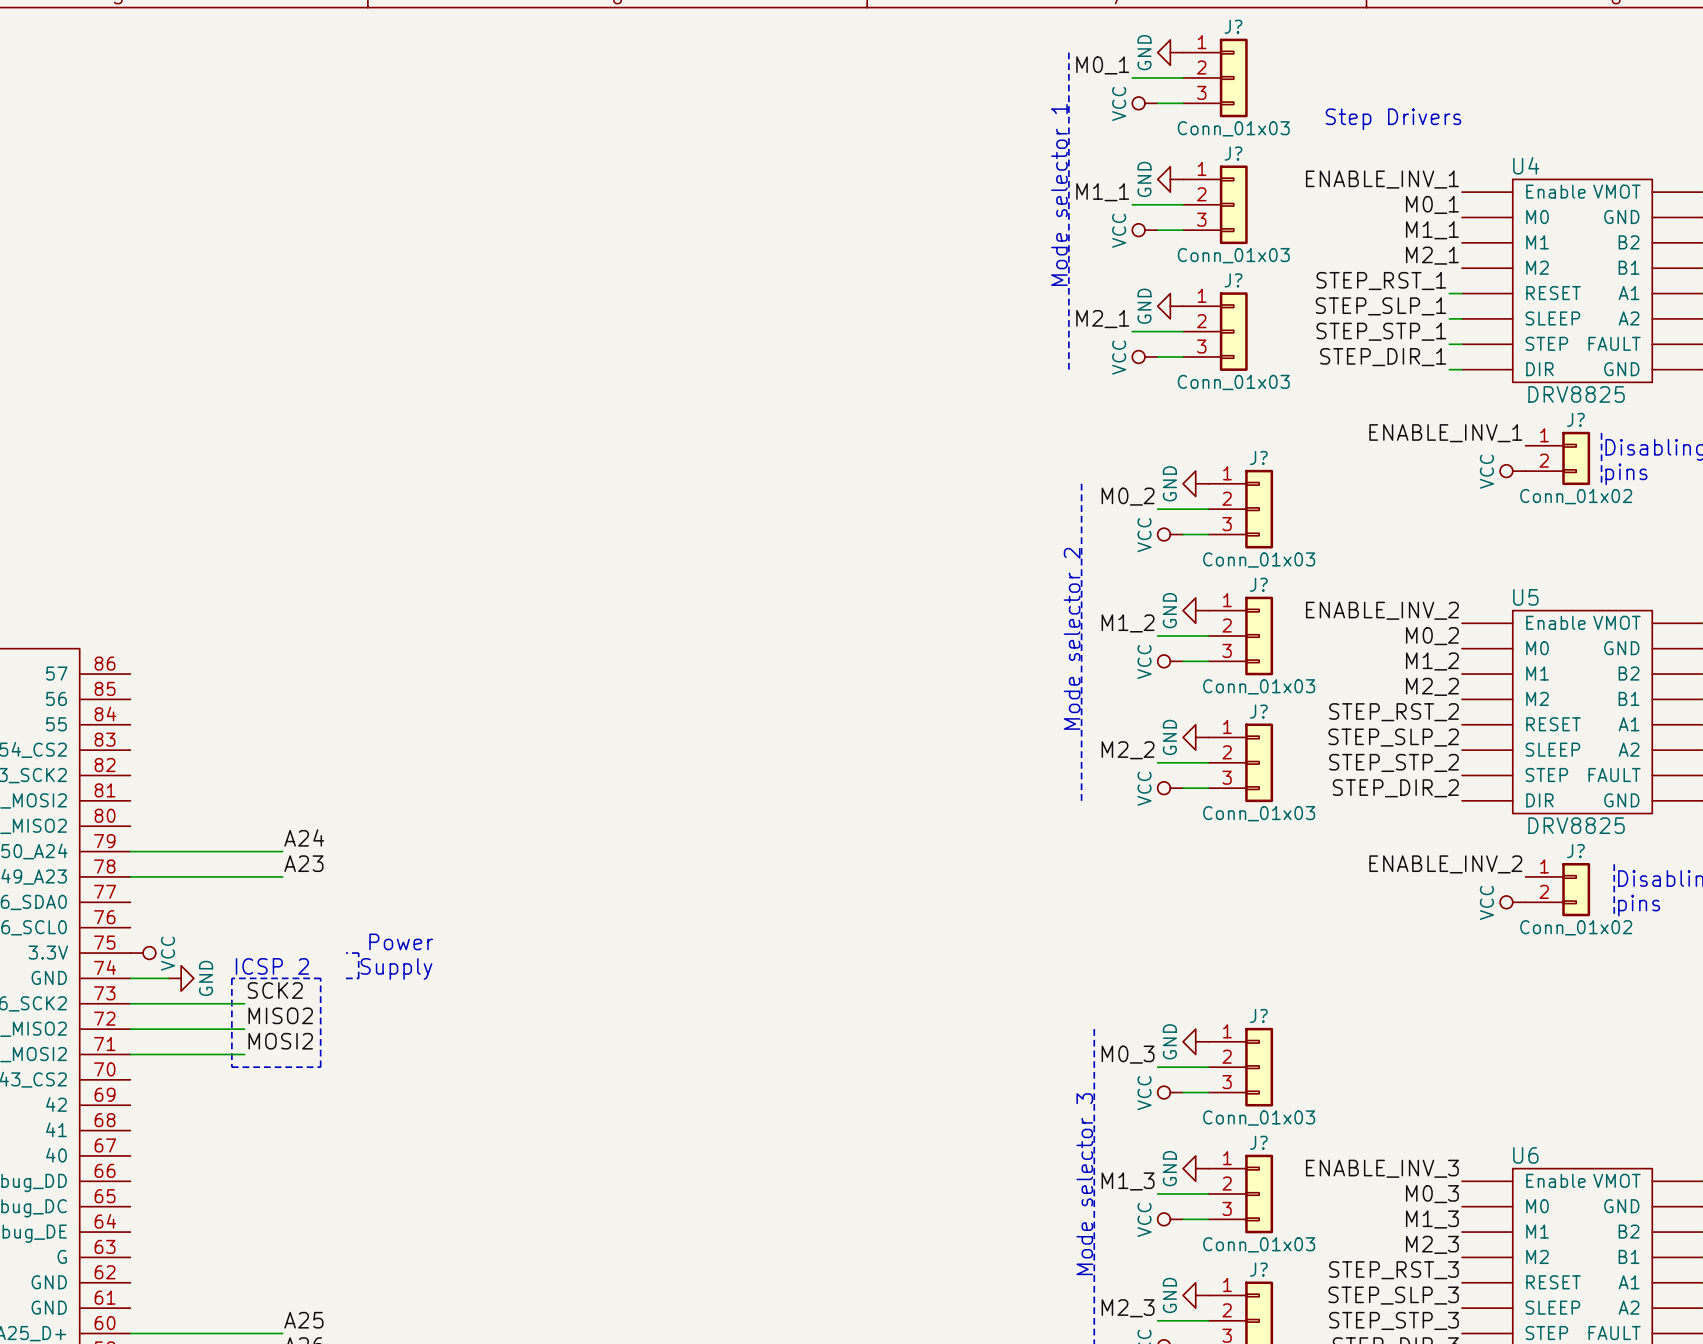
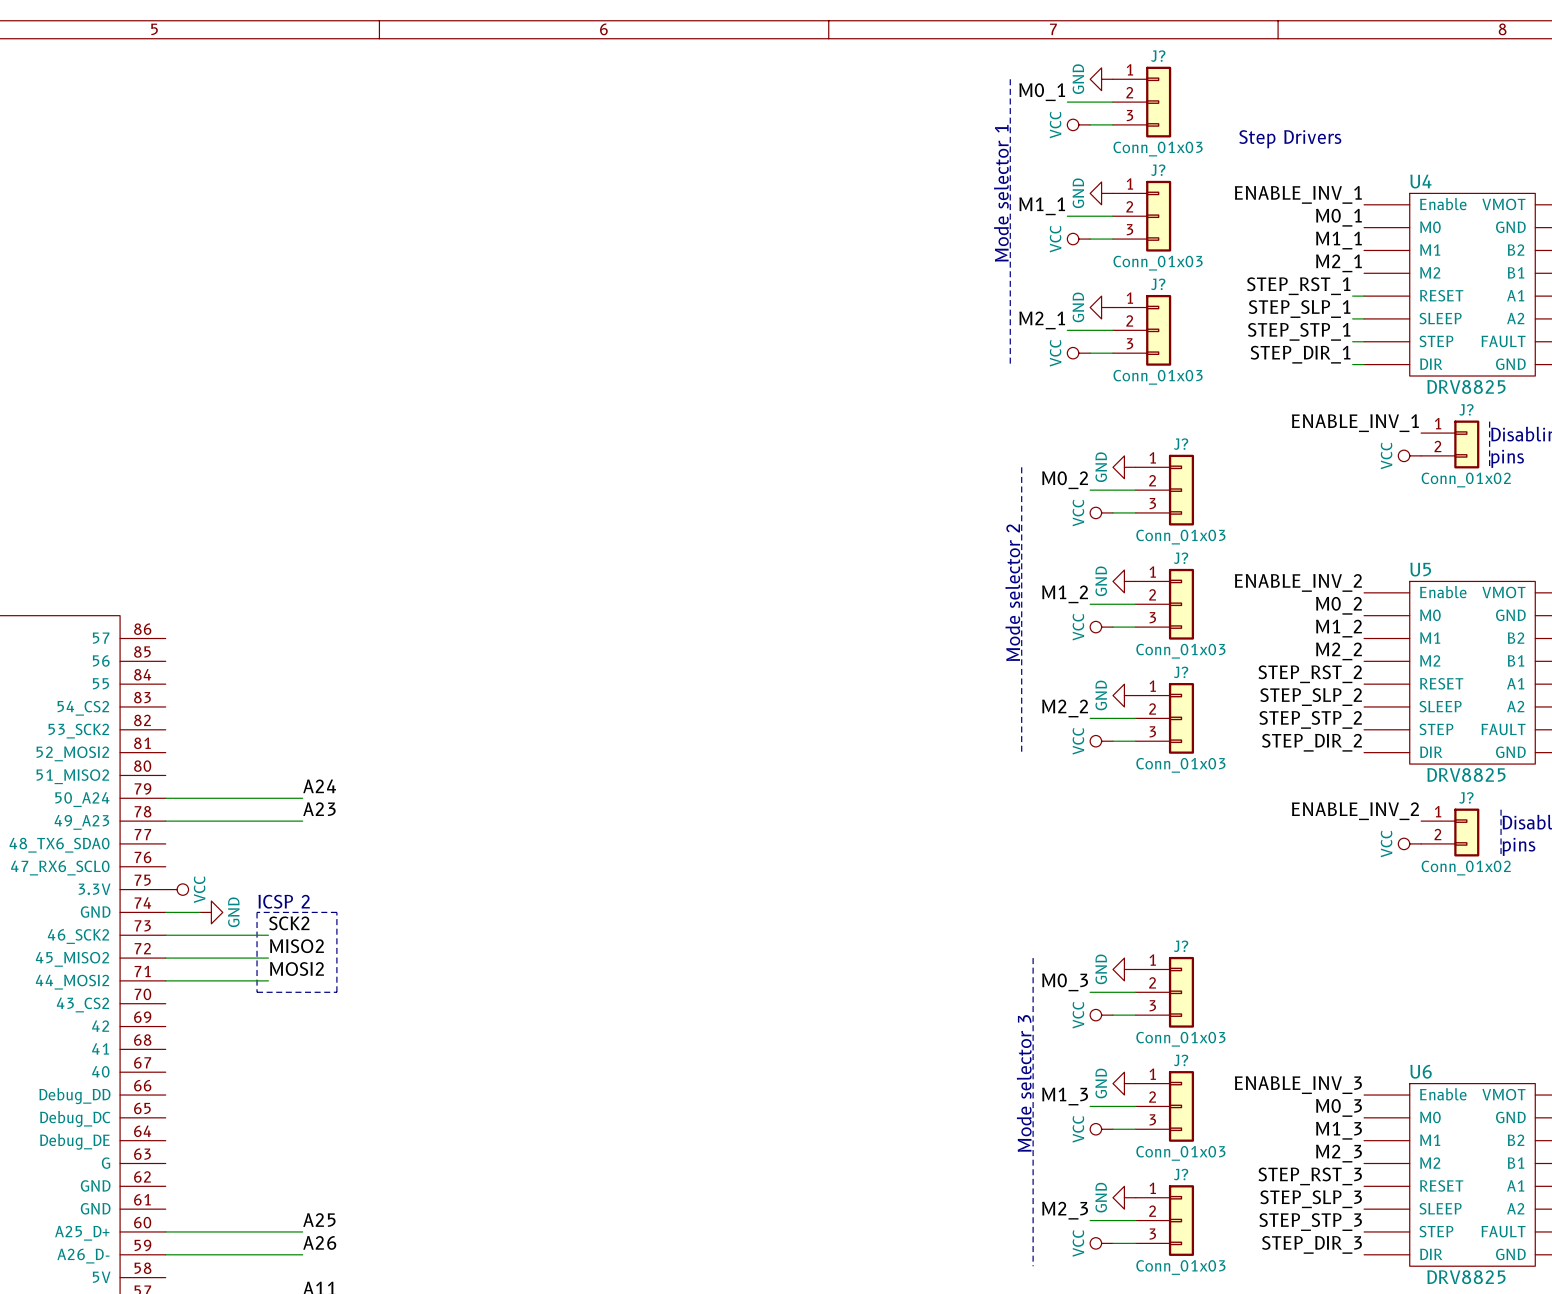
text: Power (401, 941) -> none
line: (346, 953) (358, 953) (358, 978) (346, 978) -> none
text: Supply (396, 968) -> none

